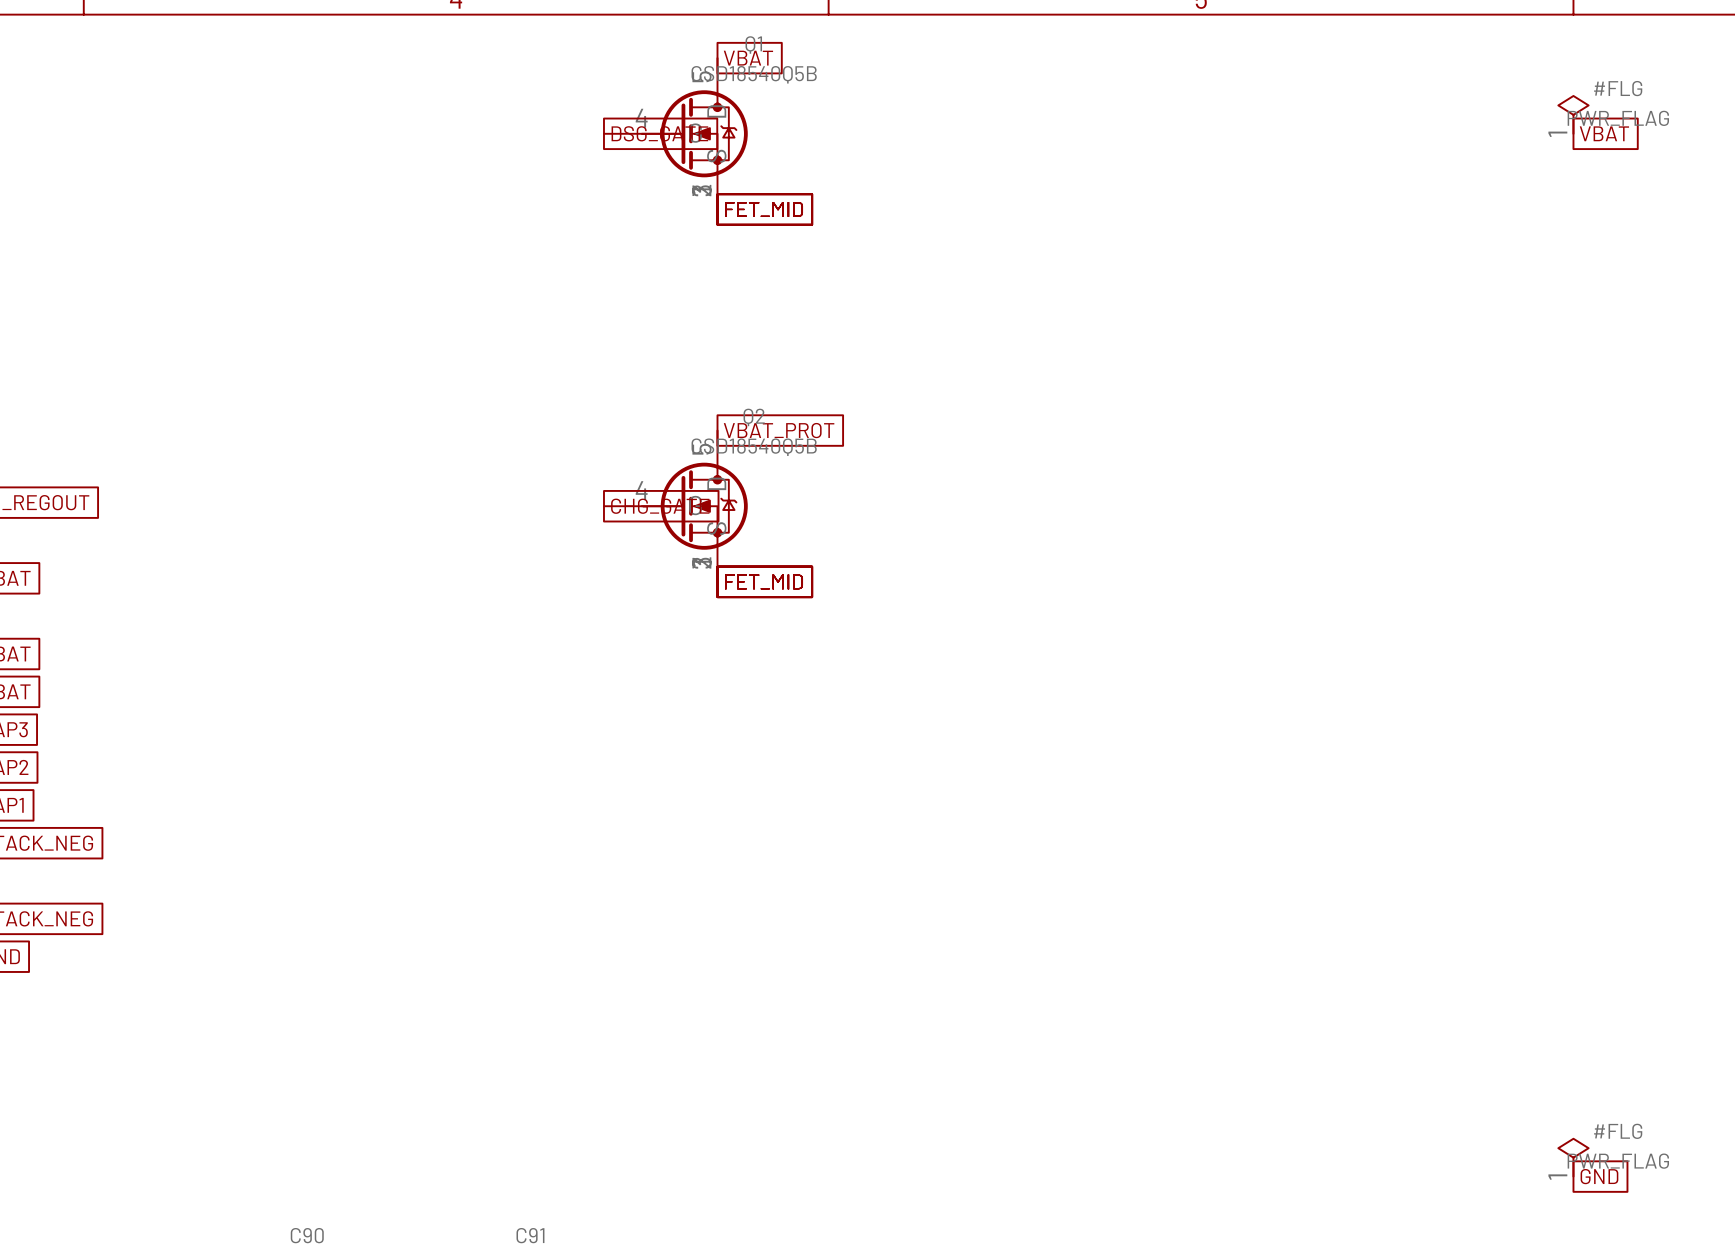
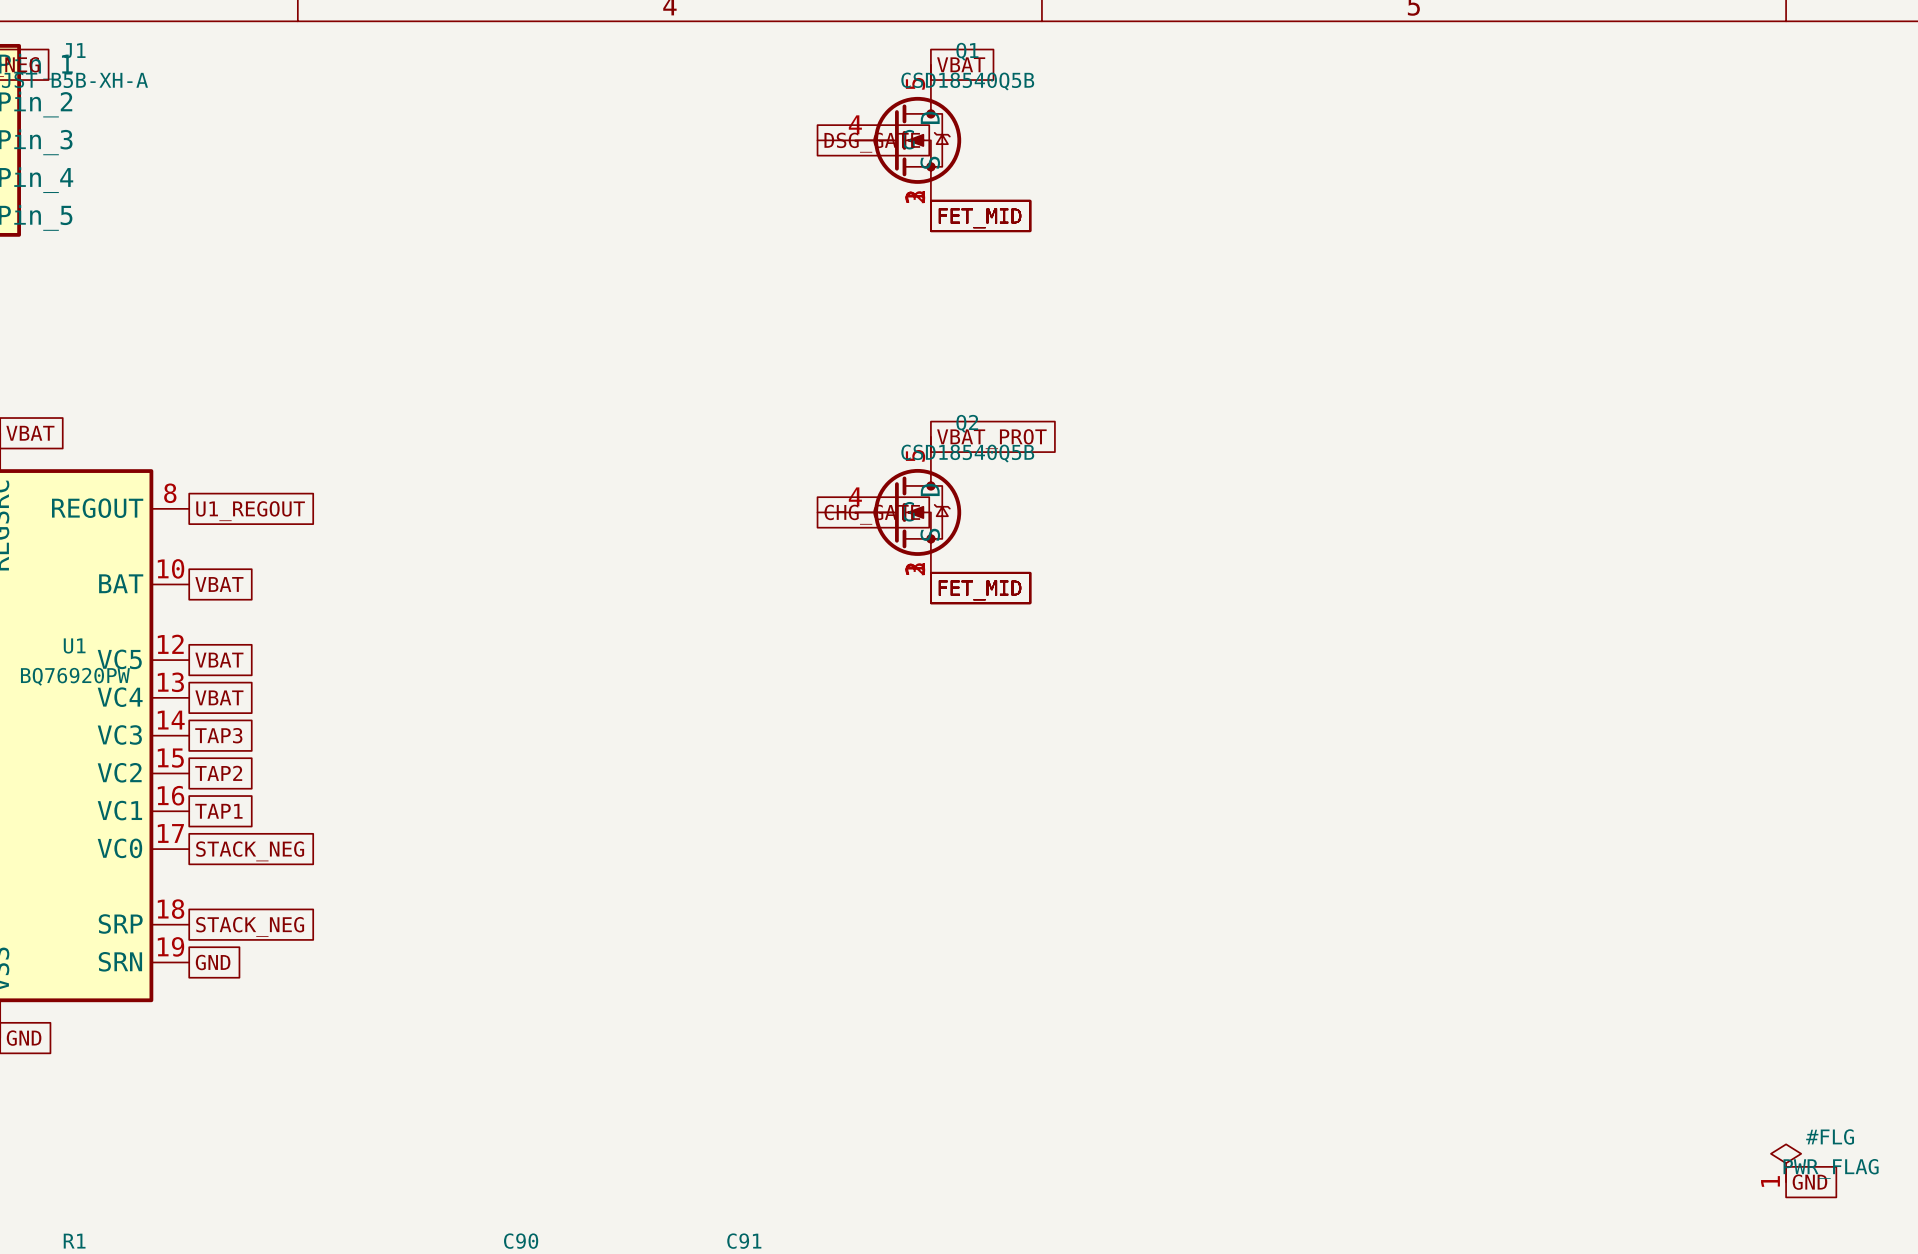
#FLG: PWR_FLAG (1573, 114) -> none
global label: VBAT (1604, 133) -> none

